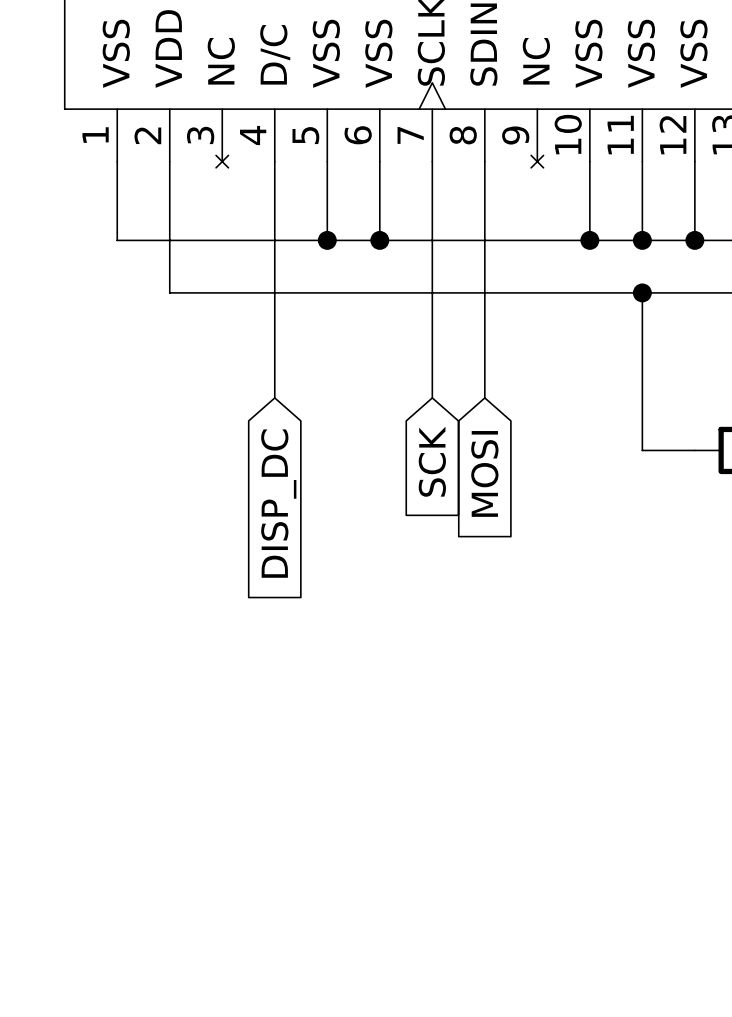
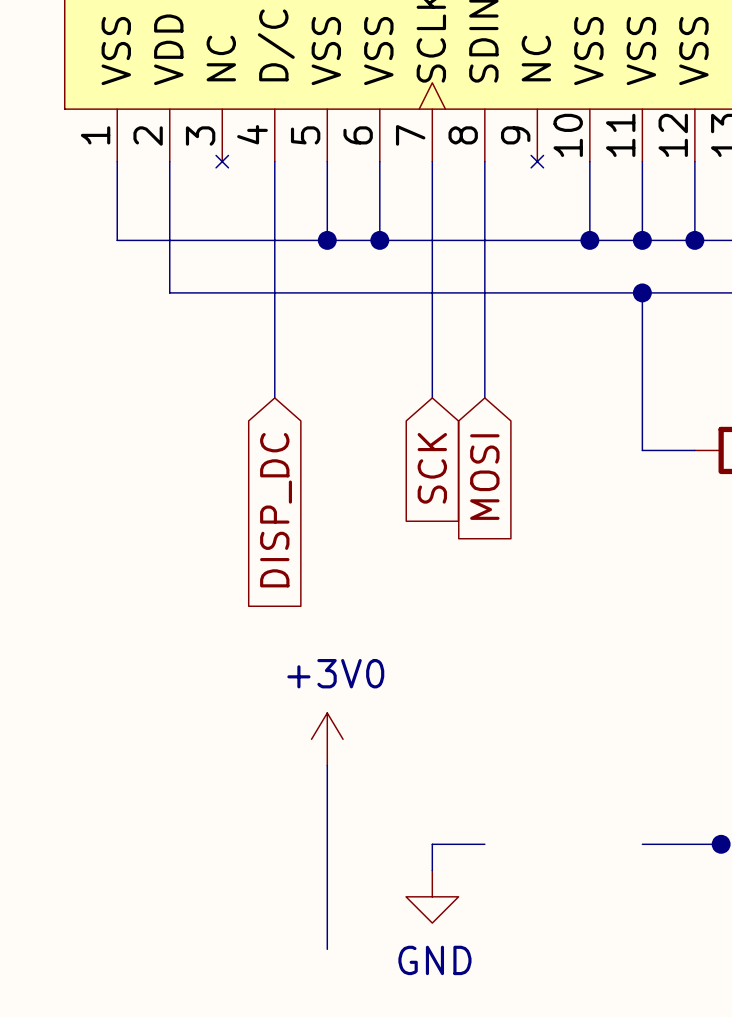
power symbol: none -> +3V0 (327, 739)
wire: none -> (327, 765) (327, 949)
wire: none -> (484, 844) (432, 844) (432, 870)
wire: none -> (642, 844) (721, 844)
junction: none -> (721, 844)
power symbol: none -> GND (432, 896)

